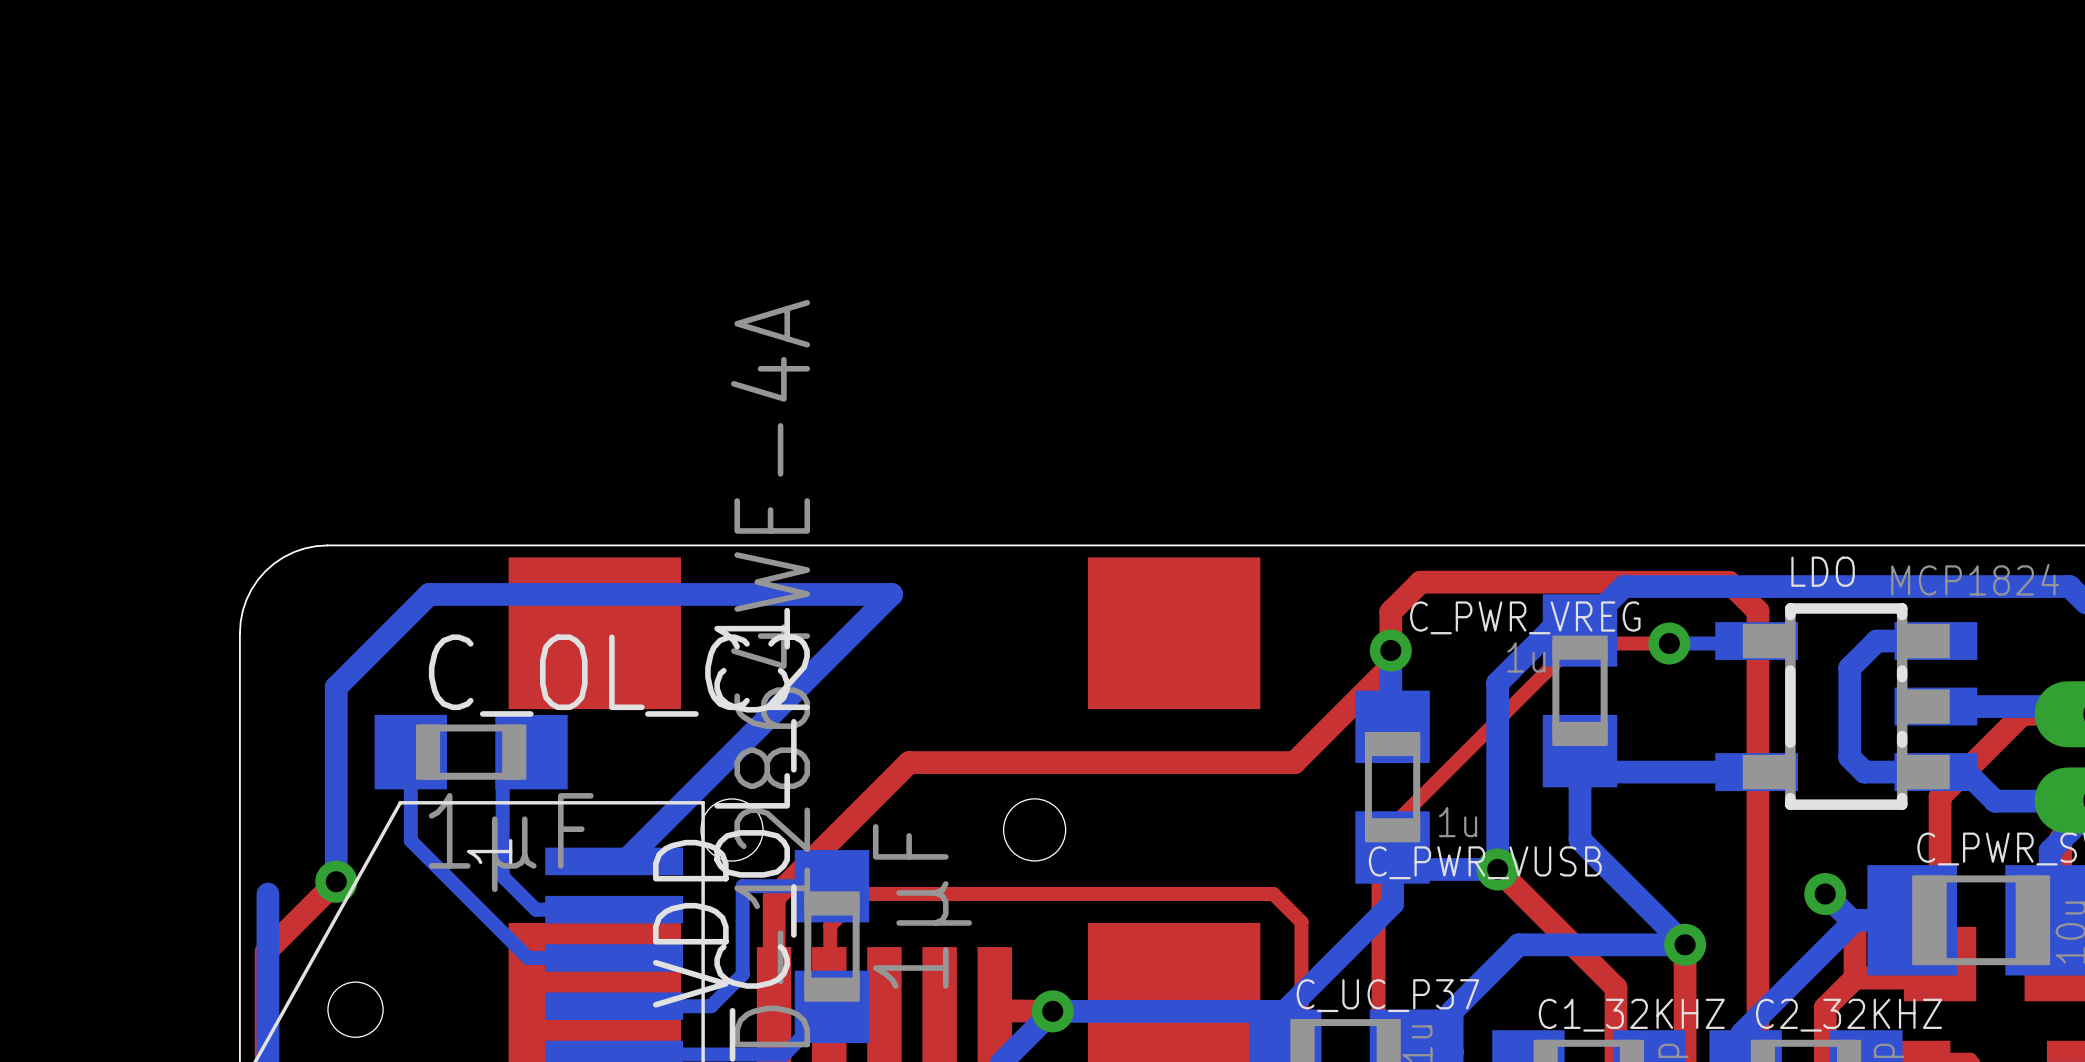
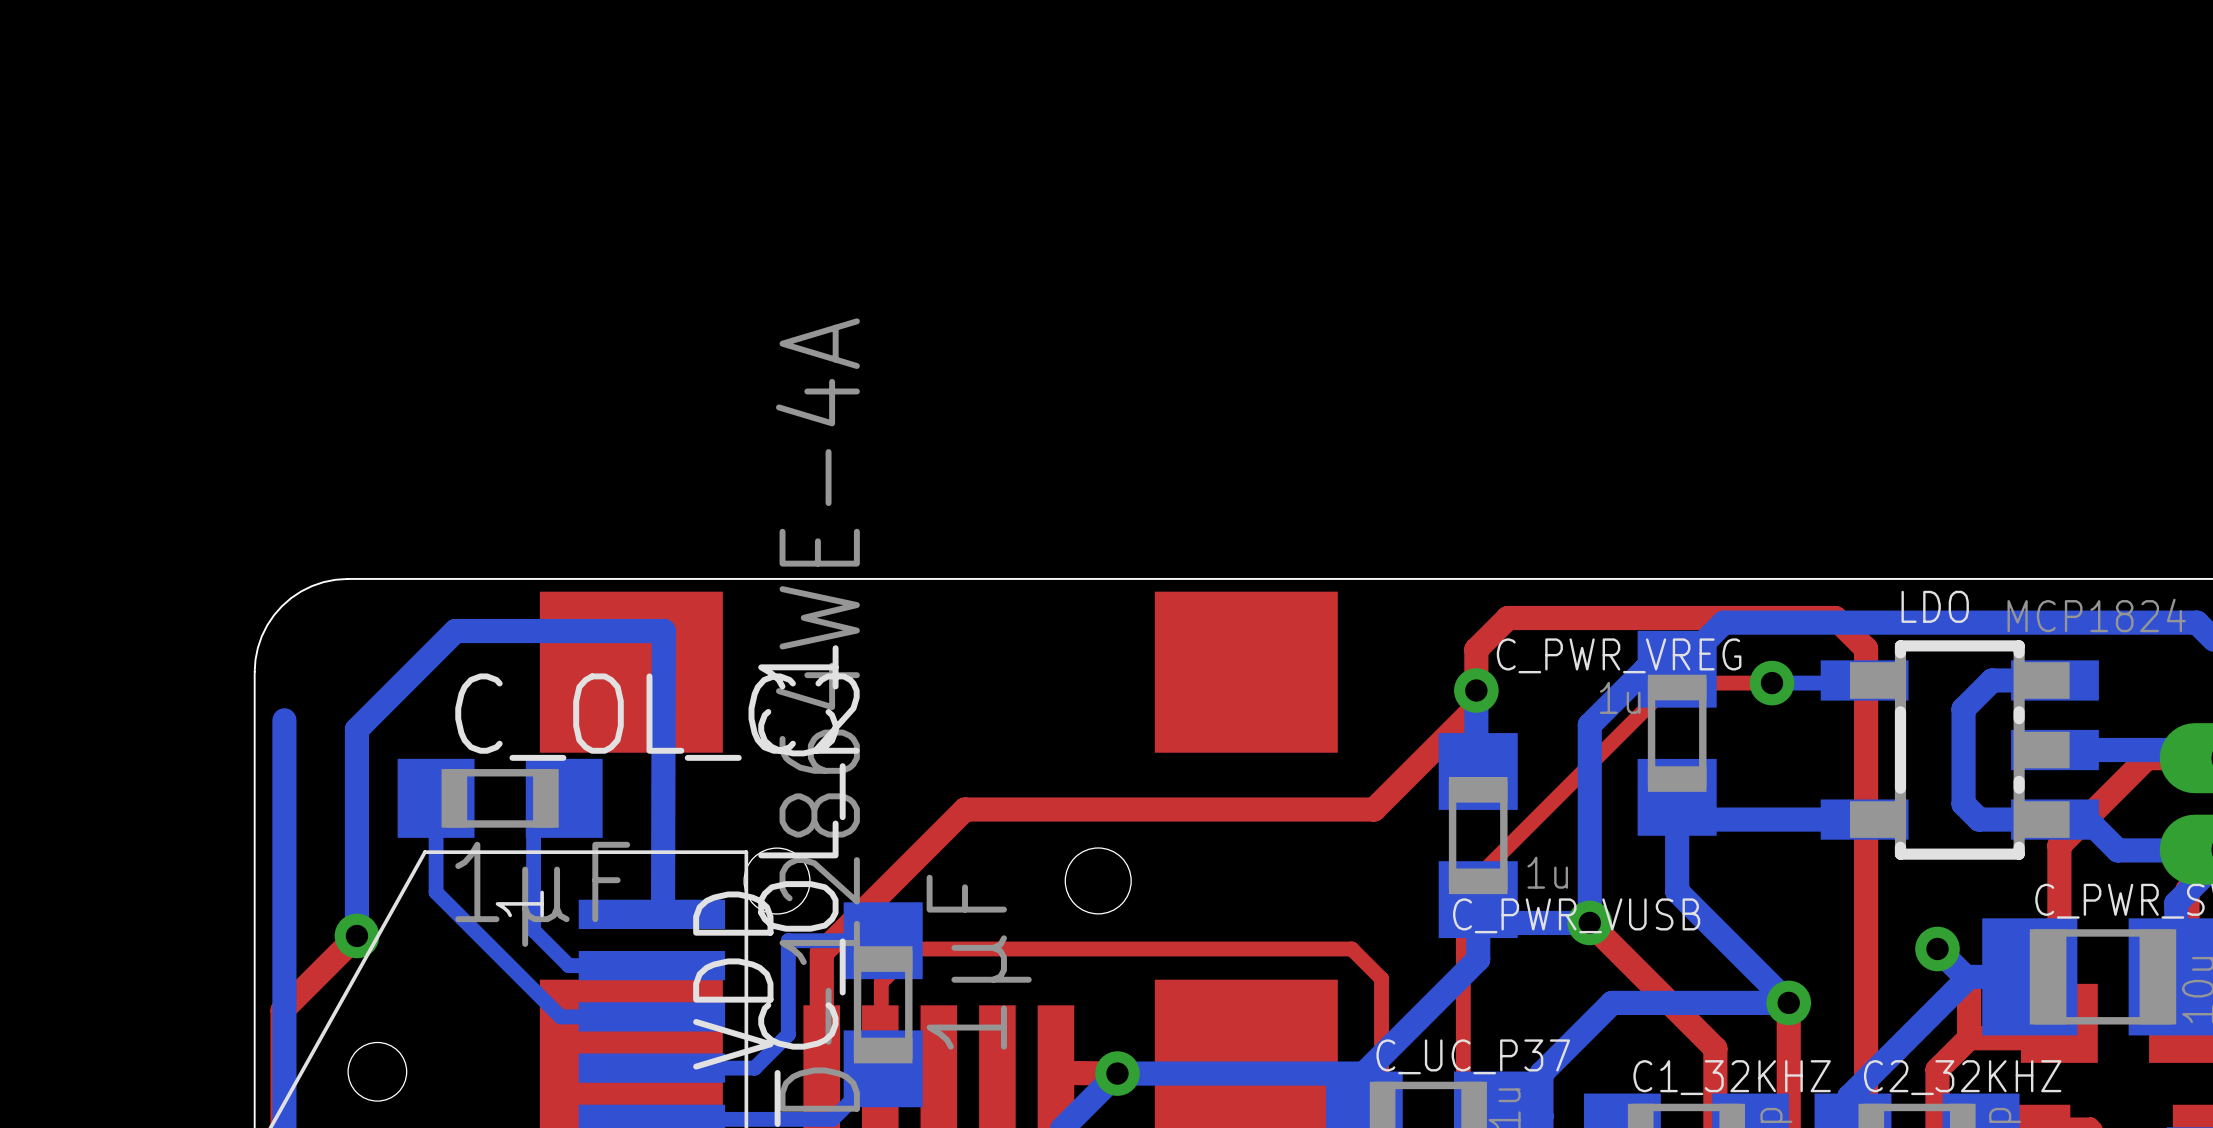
bottom track: (625, 594) (891, 594) (624, 861) -> (663, 631) (663, 914)
bottom track: none -> (284, 720) (284, 948)

